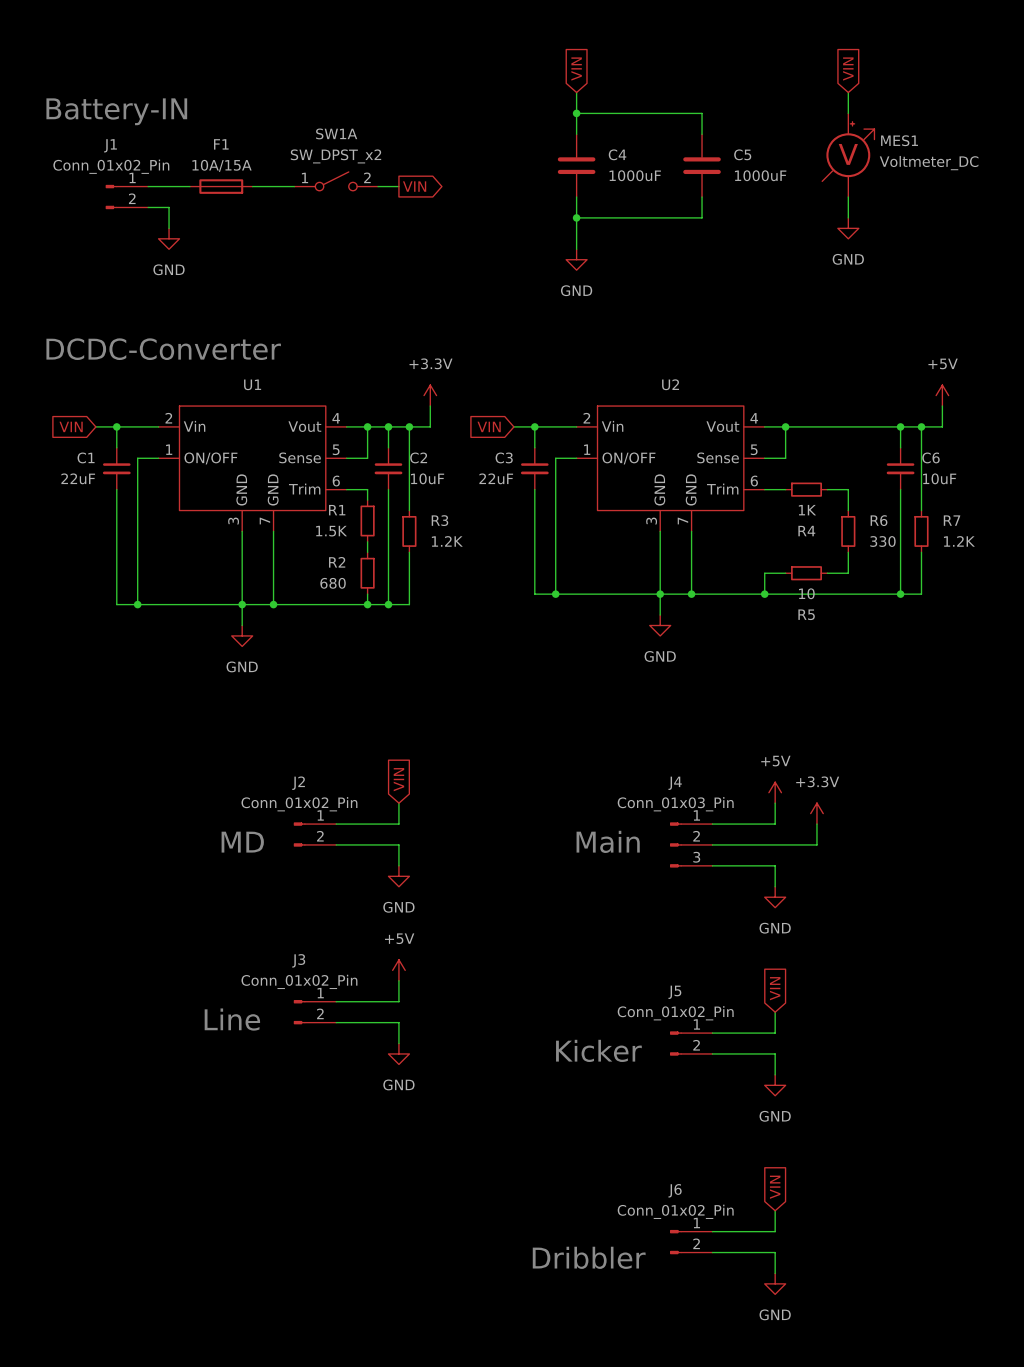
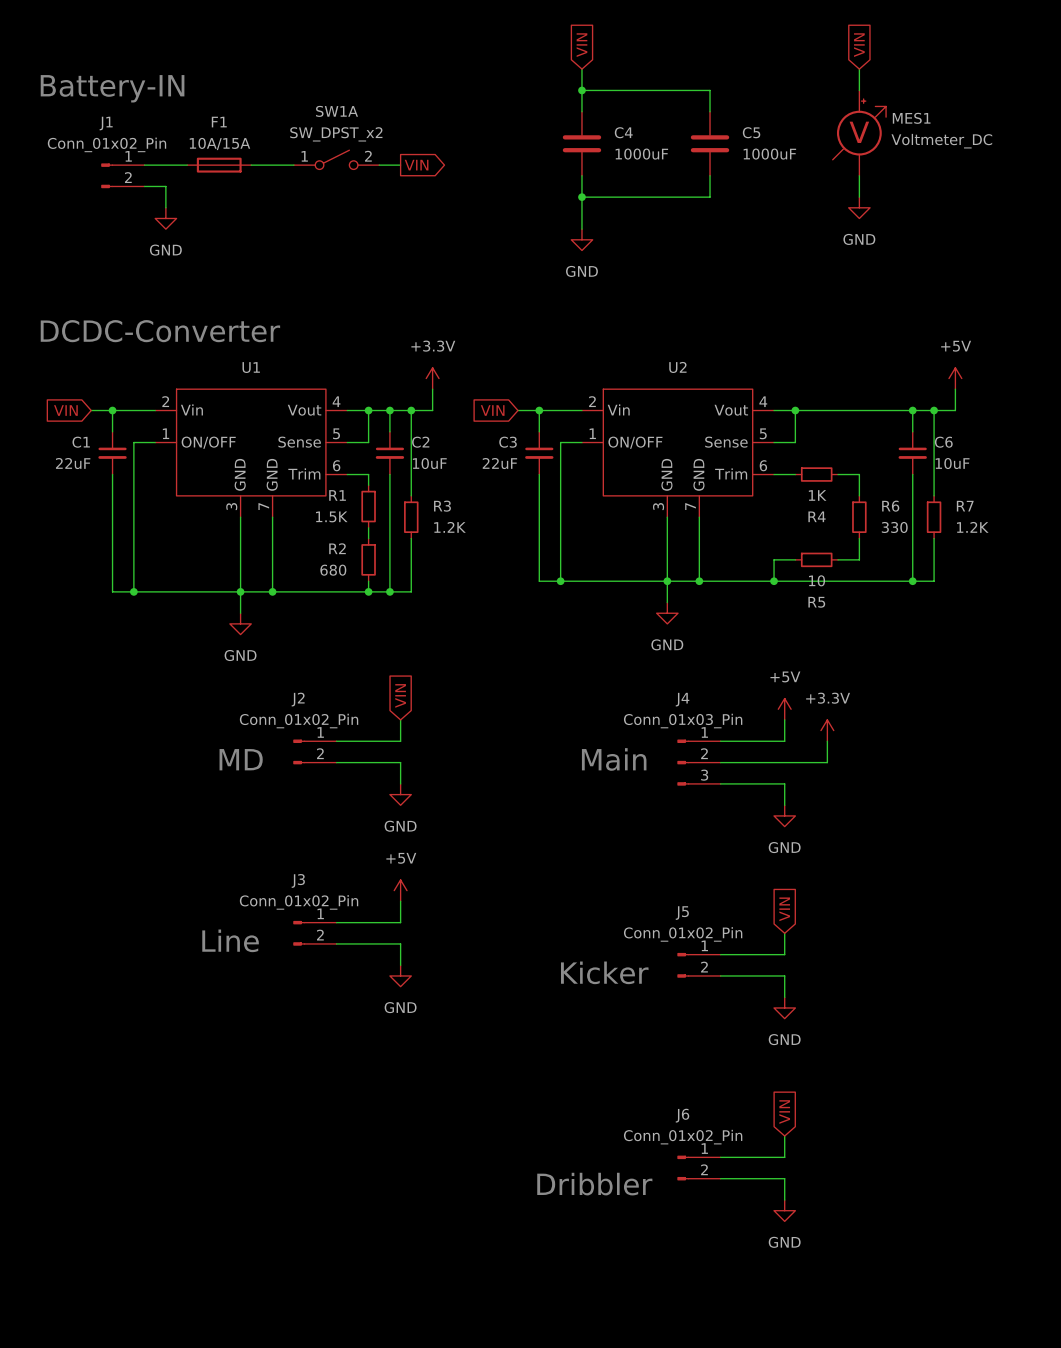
wire: none -> (784, 719) (784, 741) (720, 741)
global label position: VIN (398, 779) -> VIN (400, 695)
wire: none -> (720, 783) (784, 783) (784, 794)
power symbol position: +5V (775, 792) -> +5V (784, 709)
wire: (398, 803) (398, 824) (336, 824) -> (400, 719) (400, 741) (336, 741)
power symbol: none -> GND (400, 794)
wire: (775, 813) (775, 824) (712, 824) -> none
power symbol position: +3.3V (816, 813) -> +3.3V (827, 730)
power symbol: none -> GND (784, 815)
wire: (816, 824) (816, 844) (712, 844) -> (827, 741) (827, 762) (720, 762)
J2 position: (315, 834) -> (314, 751)
text position: Main (608, 841) -> Main (614, 759)
text position: MD (242, 842) -> MD (241, 759)
wire: (336, 844) (398, 844) (398, 865) -> (336, 762) (400, 762) (400, 783)
J4 position: (691, 844) -> (699, 762)
wire: (712, 865) (775, 865) (775, 886) -> none
power symbol: GND (398, 876) -> none
power symbol: GND (775, 897) -> none
global label: none -> VIN (784, 909)
power symbol position: +5V (398, 970) -> +5V (400, 890)
wire: (398, 980) (398, 1001) (336, 1001) -> (400, 901) (400, 922) (336, 922)
power symbol: none -> GND (400, 975)
global label: VIN (775, 988) -> none
J3 position: (315, 1012) -> (314, 933)
wire: (775, 1012) (775, 1033) (712, 1033) -> (784, 933) (784, 954) (720, 954)
power symbol: none -> GND (784, 1007)
text position: Line (232, 1019) -> Line (230, 940)
wire: (336, 1022) (398, 1022) (398, 1043) -> (336, 943) (400, 943) (400, 965)
J5 position: (691, 1043) -> (699, 965)
text position: Kicker (598, 1050) -> Kicker (604, 972)
power symbol: GND (398, 1053) -> none
wire: (712, 1053) (775, 1053) (775, 1074) -> (720, 975) (784, 975) (784, 997)
power symbol: GND (775, 1085) -> none
global label: none -> VIN (784, 1112)
global label: VIN (775, 1187) -> none
wire: (775, 1210) (775, 1231) (712, 1231) -> (784, 1136) (784, 1157) (720, 1157)
power symbol: none -> GND (784, 1210)
J6 position: (691, 1242) -> (699, 1168)
wire: (712, 1252) (775, 1252) (775, 1273) -> (720, 1178) (784, 1178) (784, 1200)
text position: Dribbler (589, 1257) -> Dribbler (594, 1184)
power symbol: GND (775, 1283) -> none

